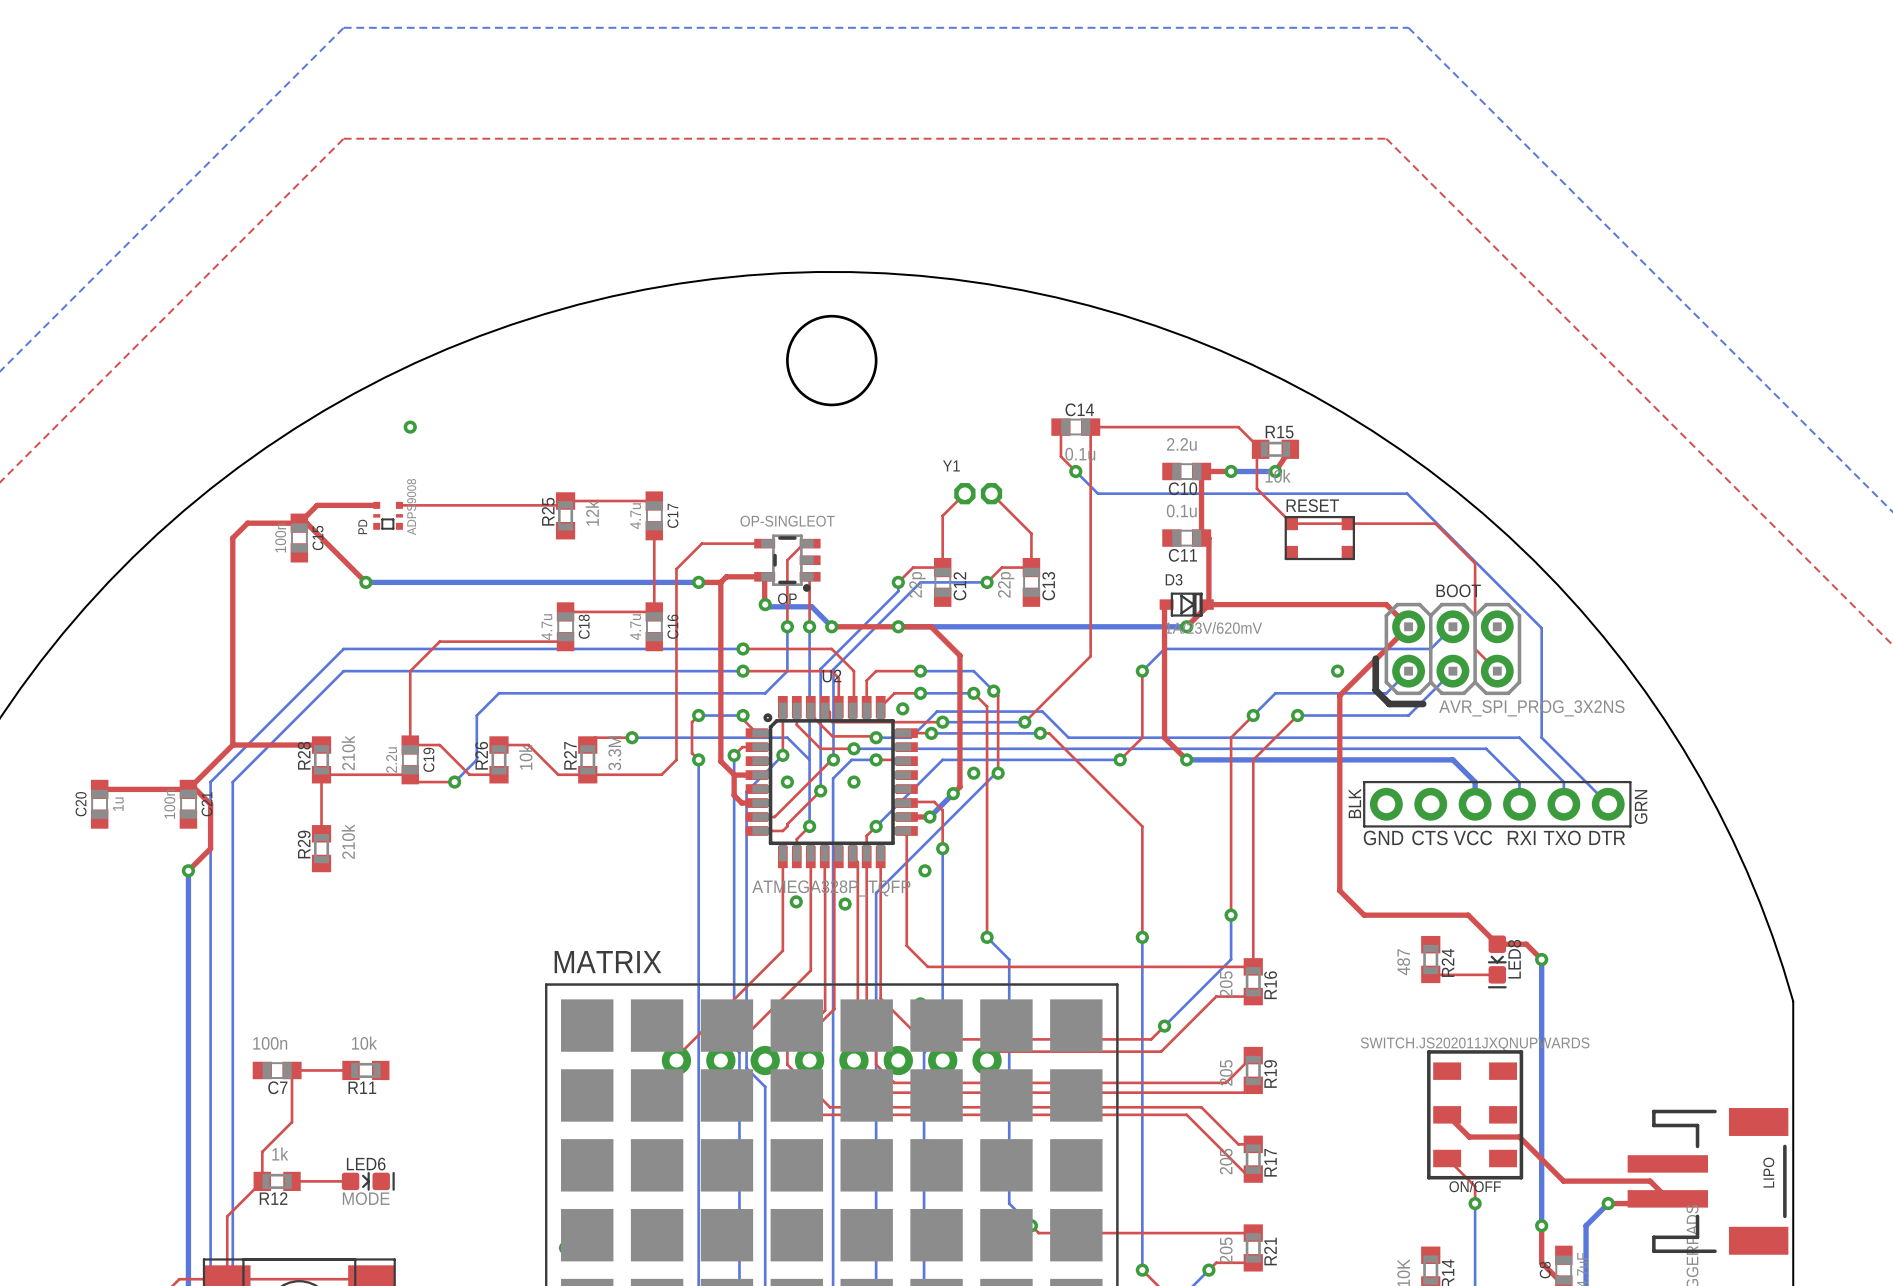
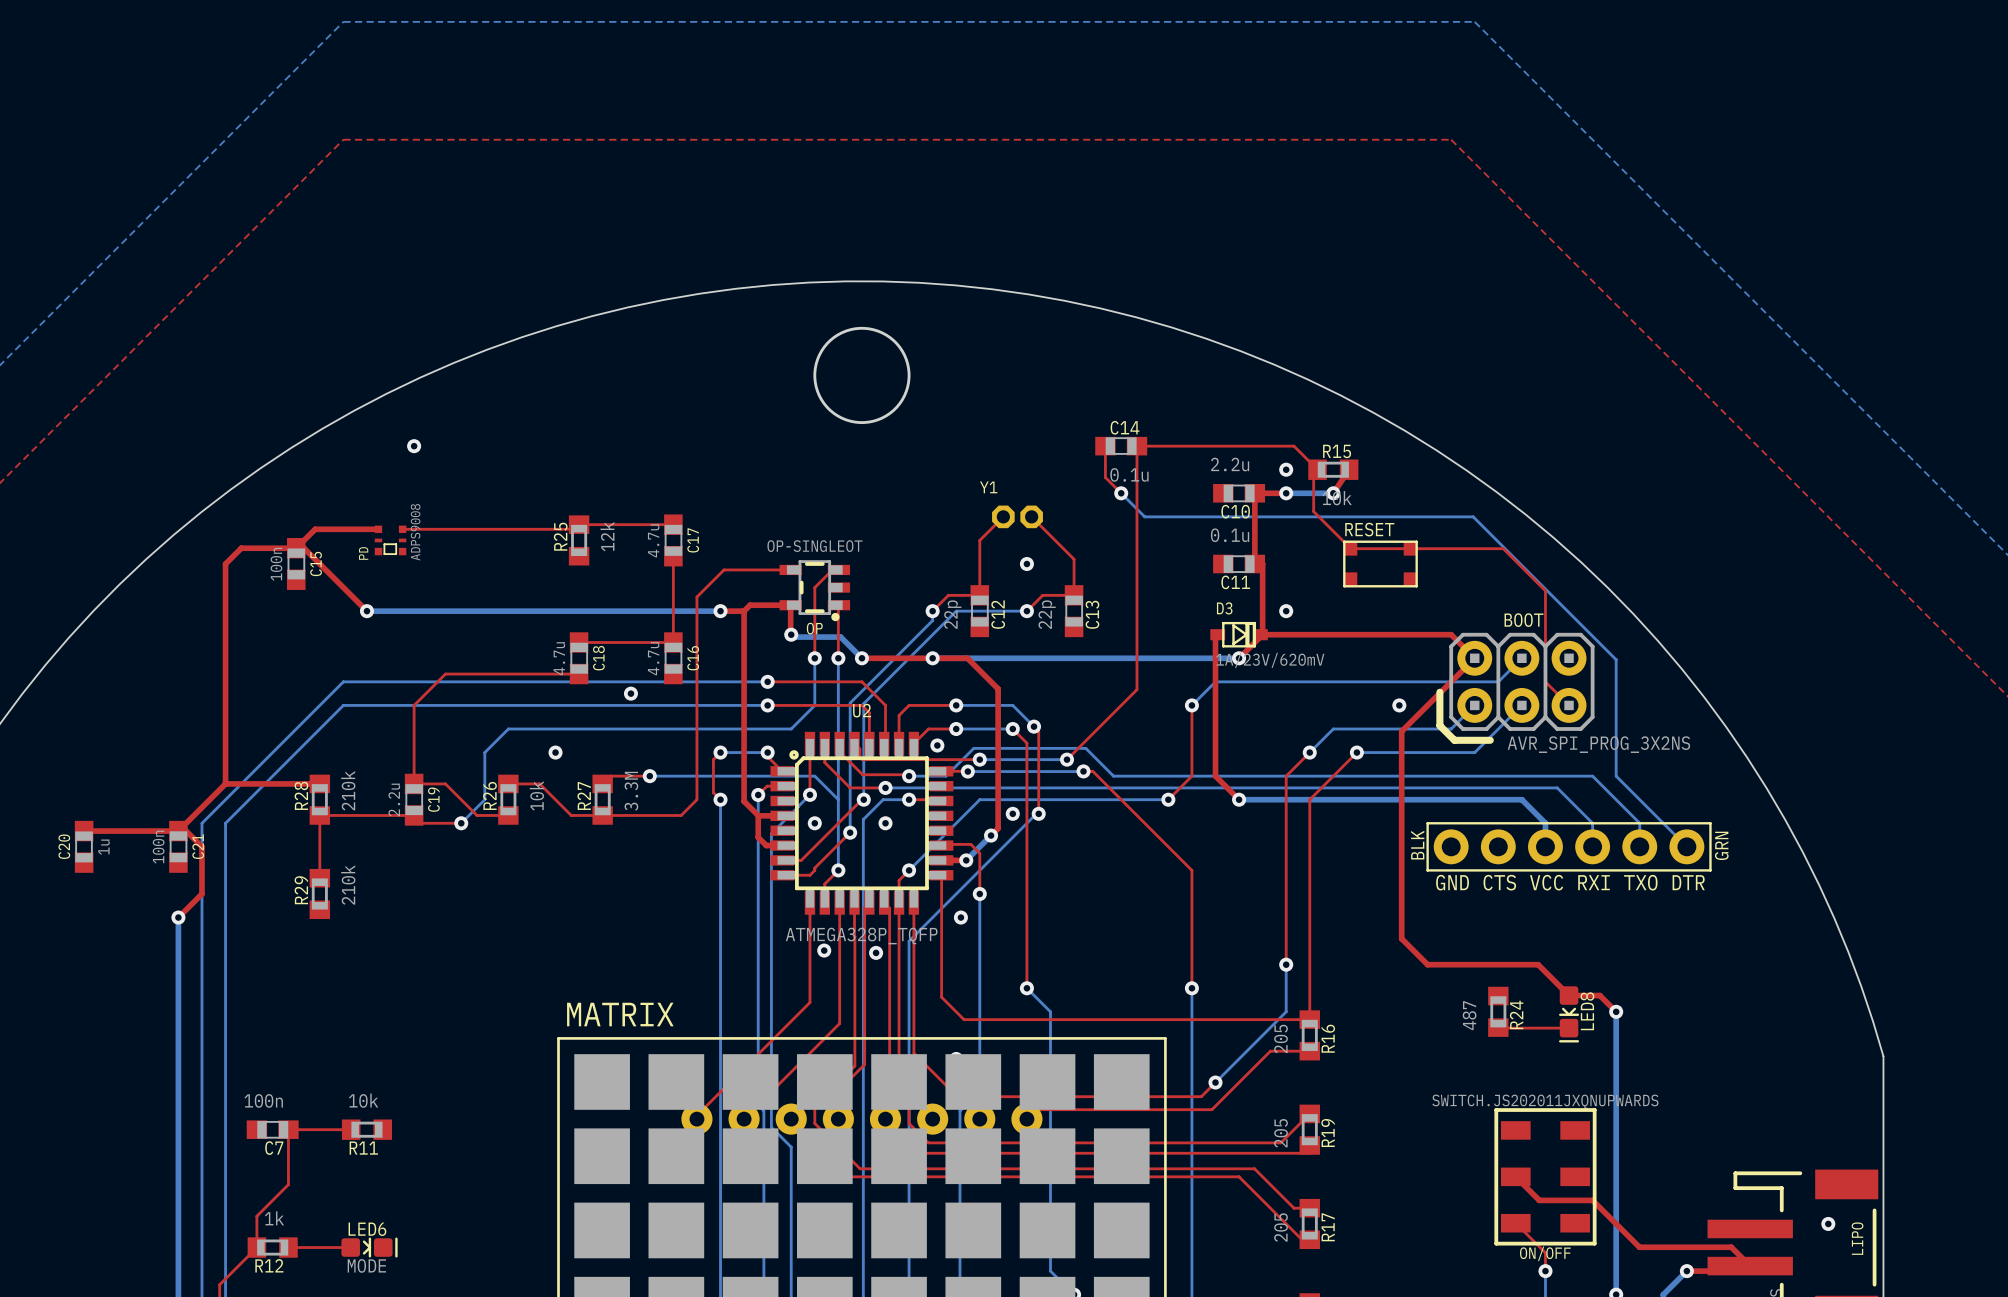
via: none -> (1286, 469)
via: none -> (1026, 564)
via: none -> (1286, 611)
via: none -> (630, 693)
via: none -> (555, 752)
via: none -> (1828, 1223)

